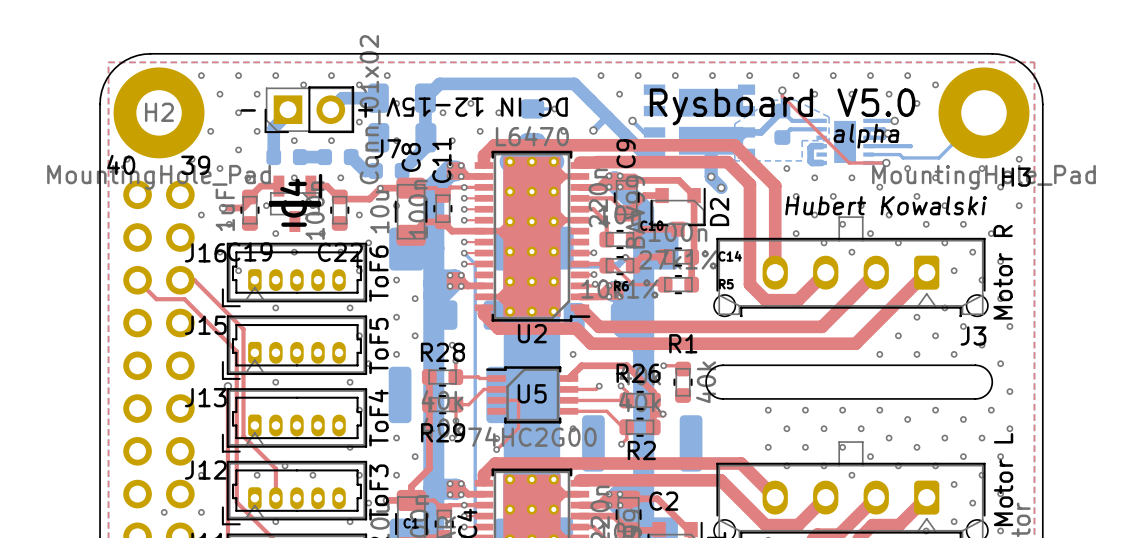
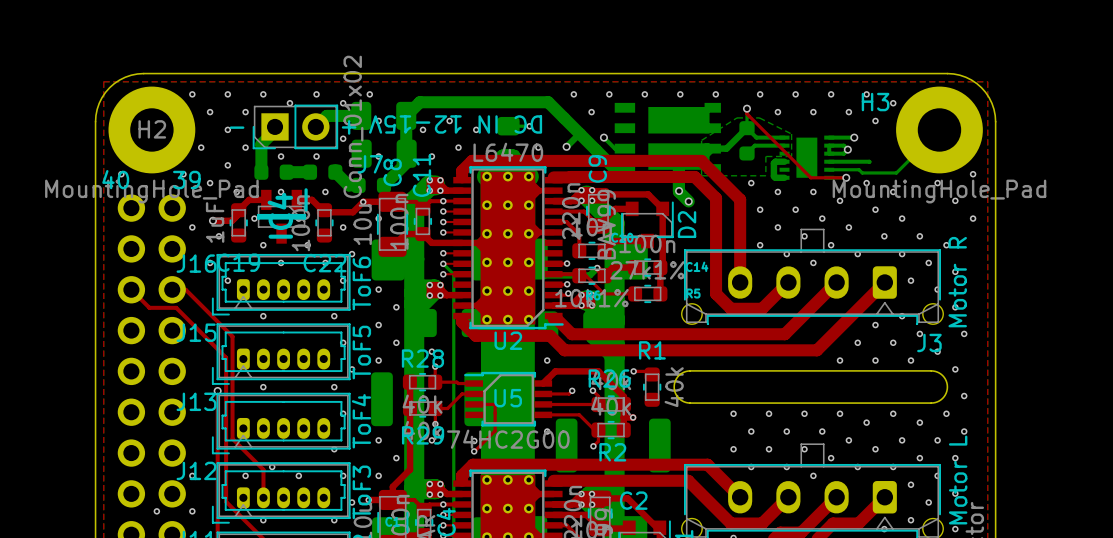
text: Rysboard V5.0 (782, 106) -> none
text: alpha (866, 136) -> none
H3 name position: H3 (1016, 177) -> H3 (875, 102)
text: Hubert Kowalski (886, 205) -> none

